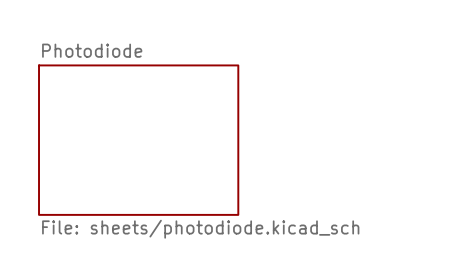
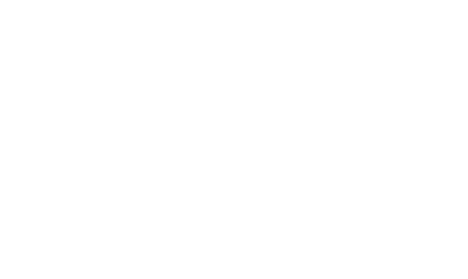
sheet Photodiode: File: sheets/photodiode.kicad_sch (138, 140) -> none

